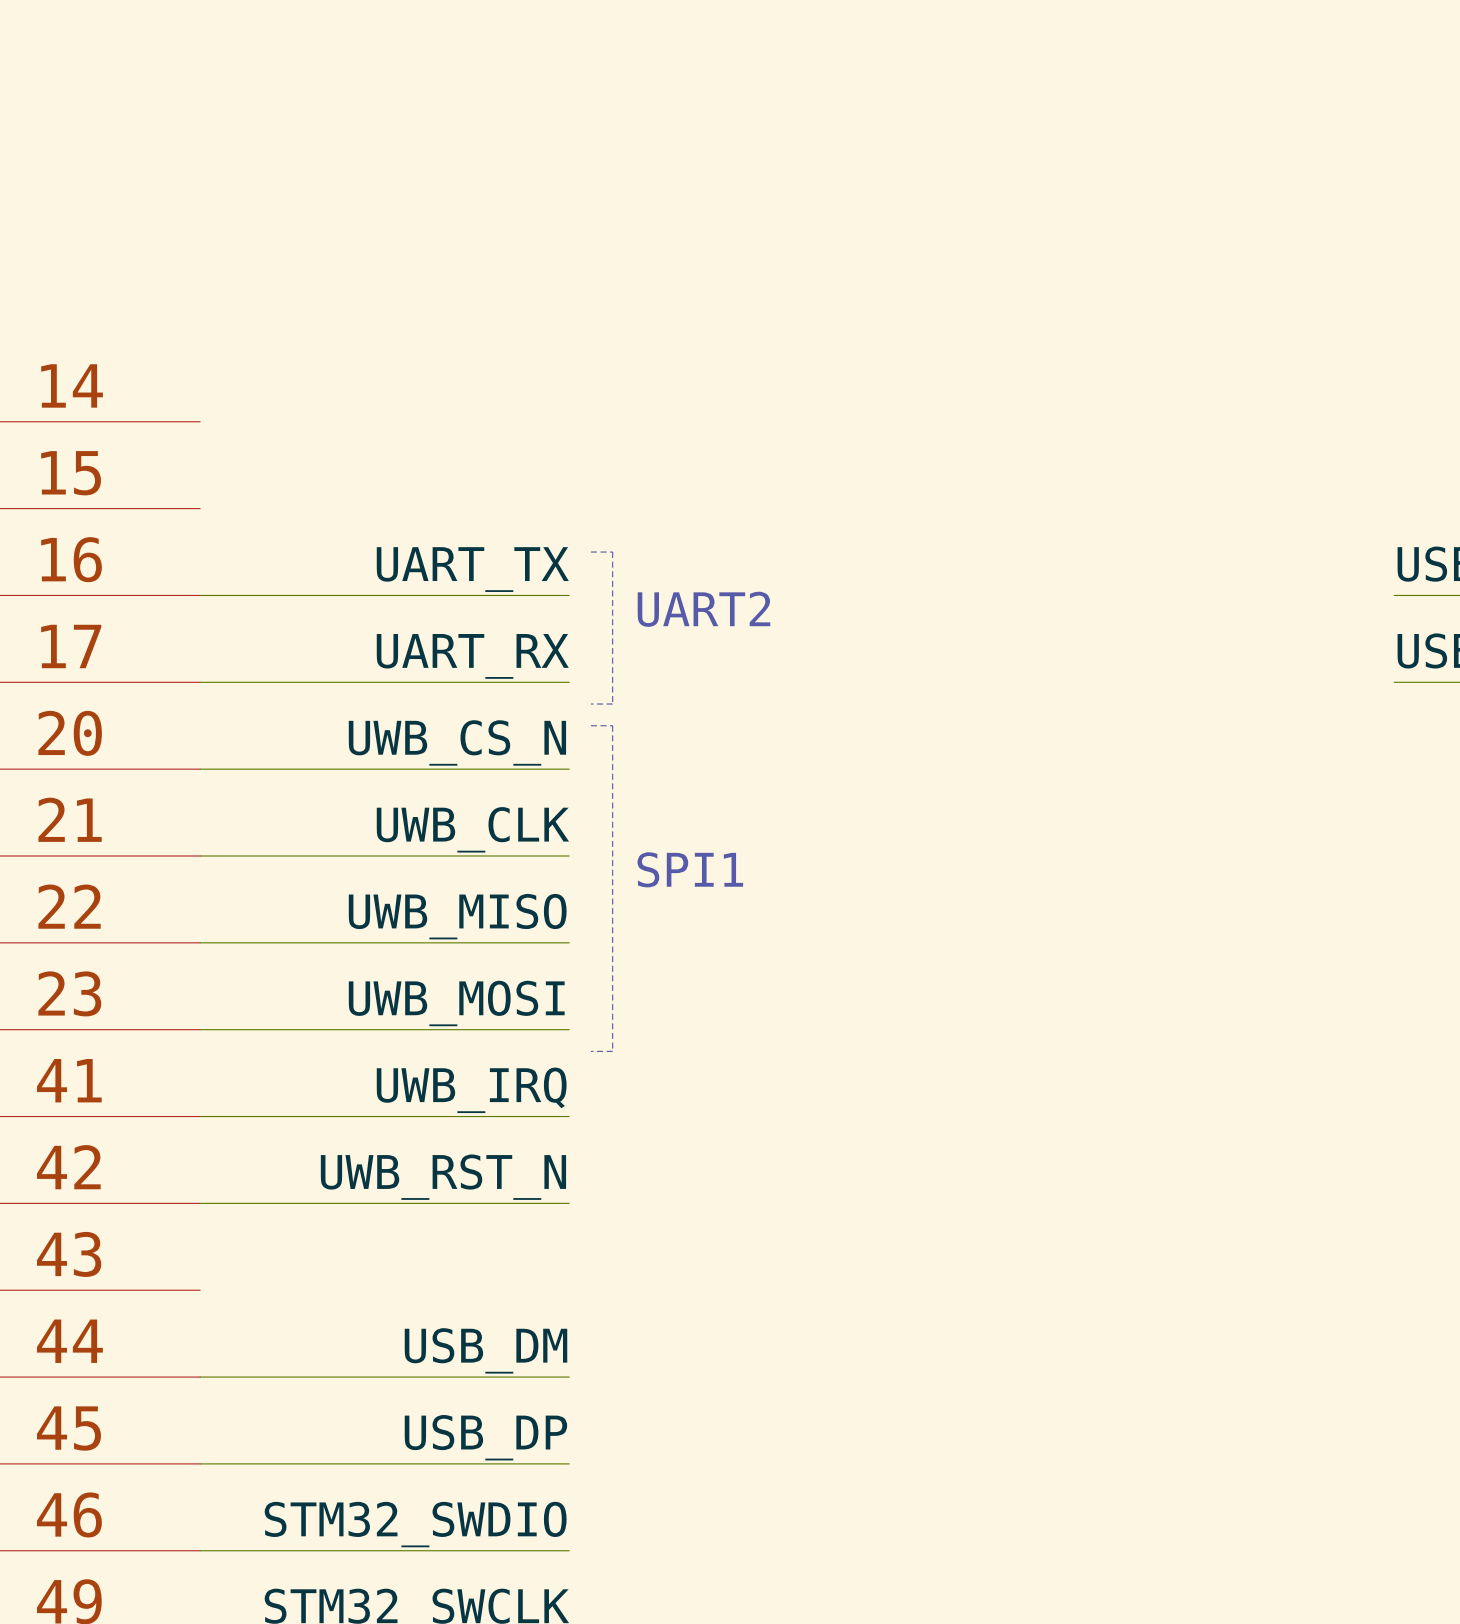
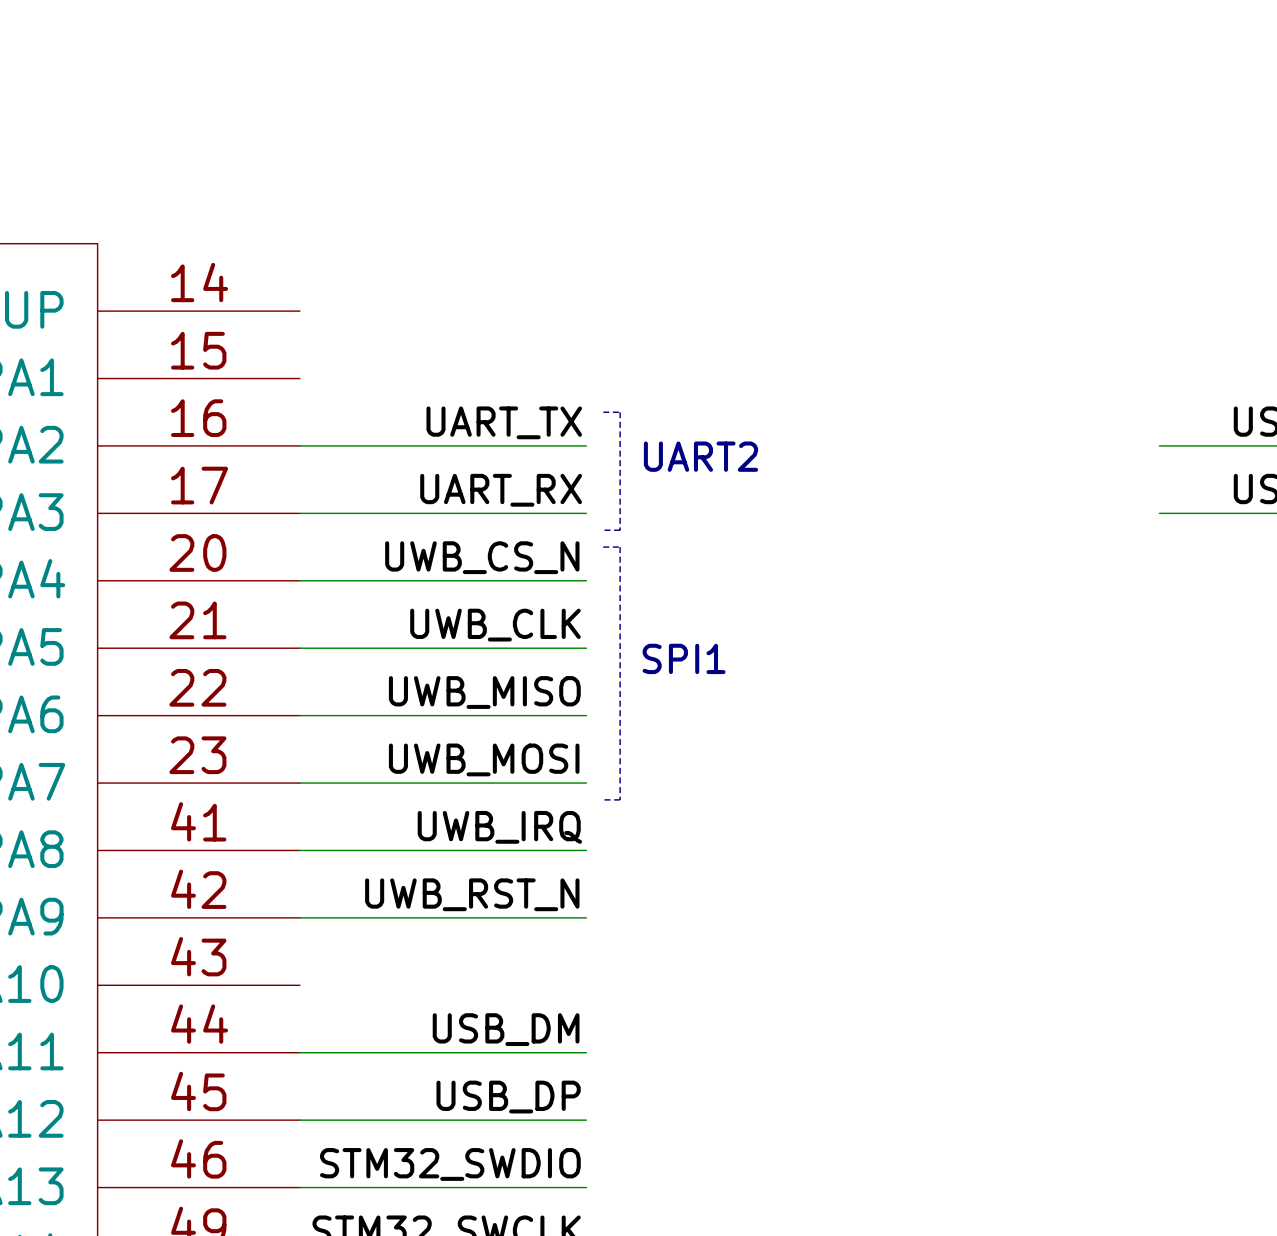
wire: none -> (1159, 445) (1226, 445)
wire: none -> (1159, 513) (1226, 513)

